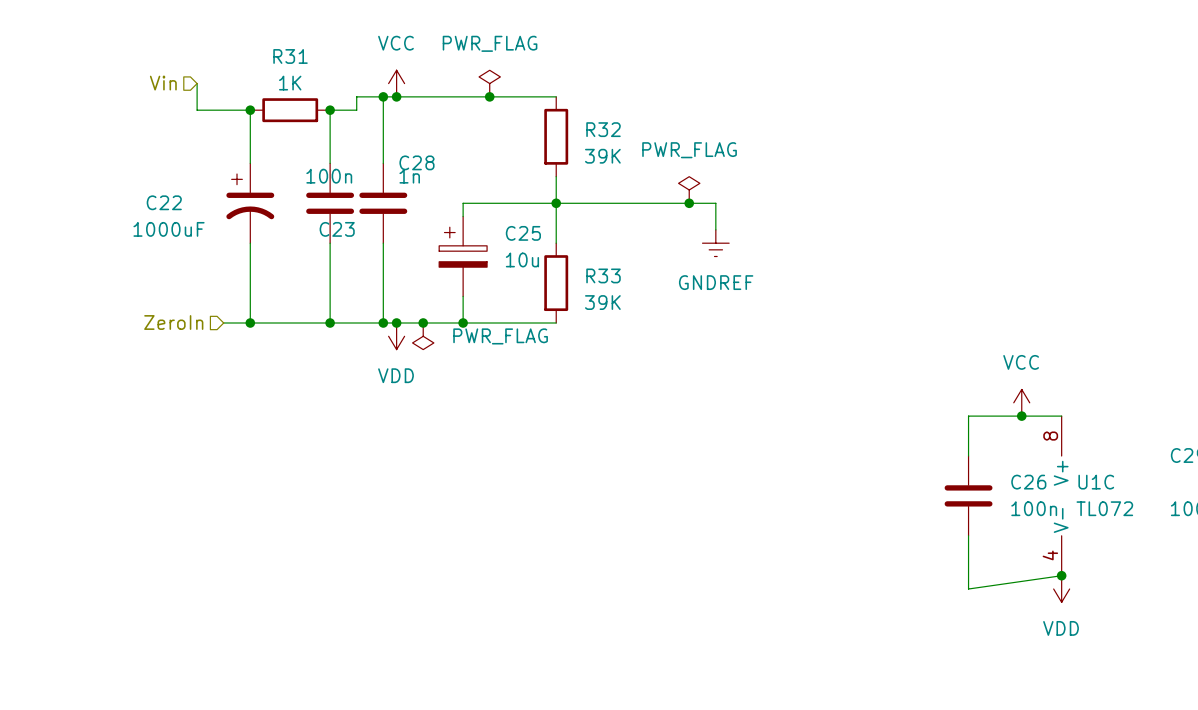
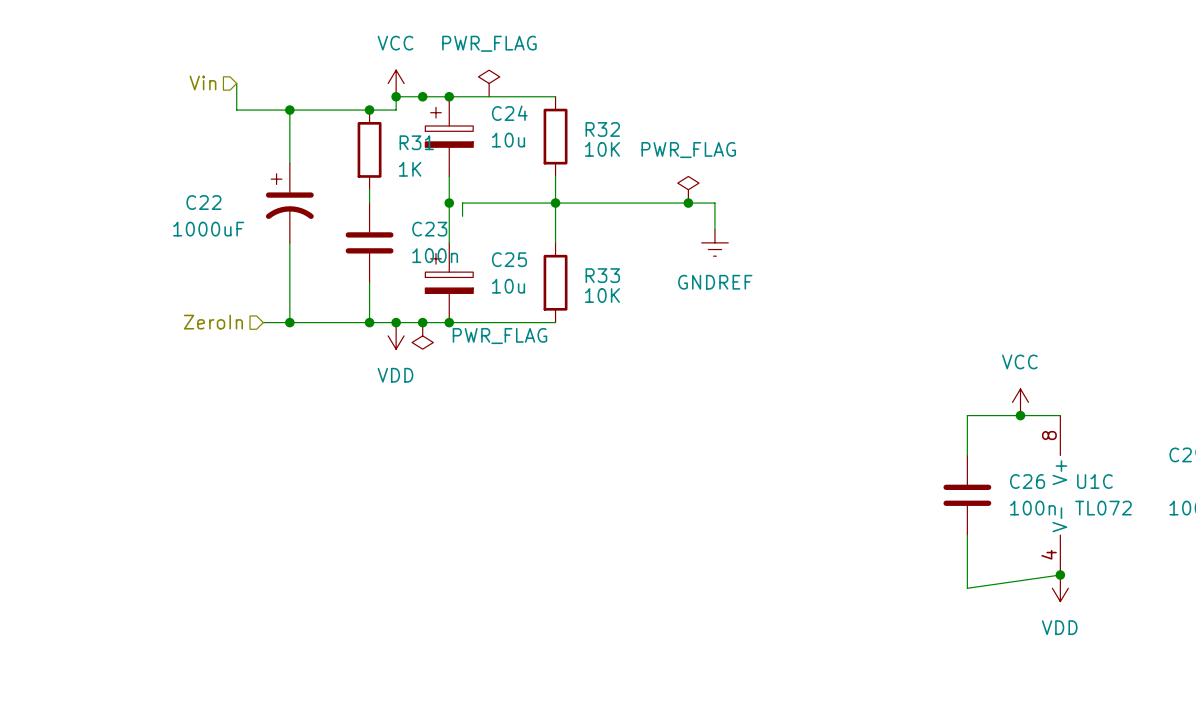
hierarchical label position: Vin (163, 83) -> Vin (202, 82)
wire: (197, 83) (197, 110) (237, 110) -> (236, 83) (236, 110)
R31 value position: 1K (290, 83) -> 1K (410, 169)
wire: (383, 96) (383, 163) -> (449, 176) (449, 242)
junction position: (383, 96) -> (369, 110)
wire: (396, 96) (356, 96) (356, 110) -> (396, 96) (396, 110) (356, 110)
junction: none -> (422, 96)
junction: none -> (449, 96)
junction: (489, 96) -> none
wire: (250, 110) (250, 163) -> (250, 110) (329, 110)
junction: (250, 110) -> none
junction: none -> (289, 110)
R31 rotation: 0° (290, 110) -> 90° clockwise (369, 149)
R31 position: (290, 110) -> (369, 149)
wire: (330, 110) (330, 163) -> (289, 110) (289, 163)
junction: (330, 110) -> none
C24: none -> 10u (449, 136)
R32 value: 39K (602, 156) -> 10K (602, 149)
C23 value position: 100n (329, 176) -> 100n (435, 255)
wire: none -> (369, 189) (369, 203)
C22 position: (250, 203) -> (289, 203)
C23 position: (330, 203) -> (369, 242)
C28: 1n (383, 203) -> none
junction: none -> (449, 203)
C23 name position: C23 (337, 229) -> C23 (429, 229)
wire: (250, 243) (250, 322) -> none
wire: (330, 243) (330, 322) -> (289, 242) (289, 322)
wire: (383, 243) (383, 322) -> none
C25 position: (463, 256) -> (449, 282)
wire: none -> (369, 282) (369, 322)
wire: (463, 296) (463, 322) -> none
R33 value: 39K (602, 302) -> 10K (602, 295)
hierarchical label position: ZeroIn (173, 322) -> ZeroIn (213, 322)
wire: (223, 322) (263, 322) -> none
junction: (250, 322) -> none
junction: none -> (289, 322)
junction: (330, 322) -> none
junction position: (383, 322) -> (369, 322)
junction position: (463, 322) -> (449, 322)

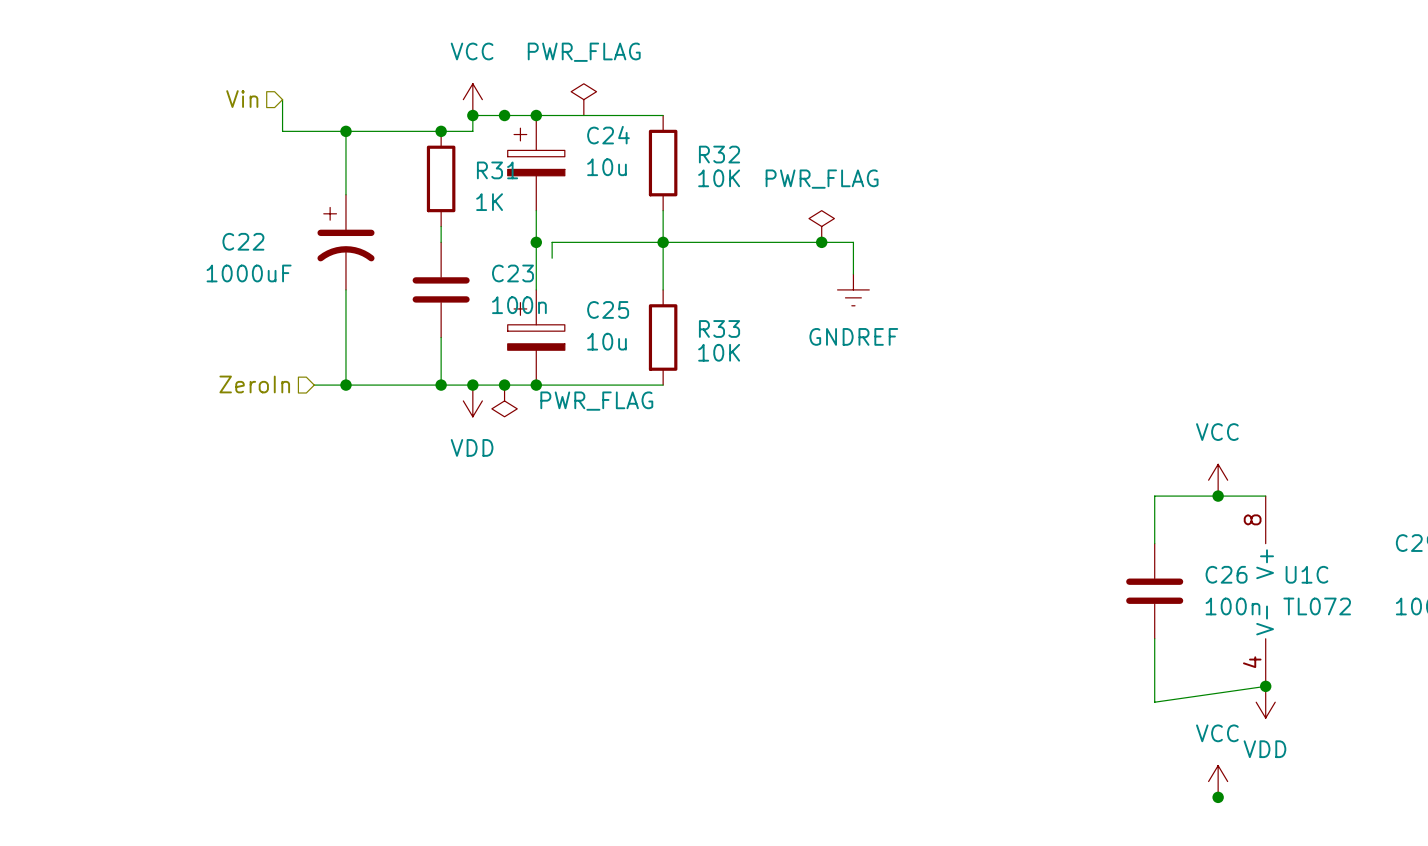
power symbol: none -> VCC (1218, 781)
junction: none -> (1218, 797)

